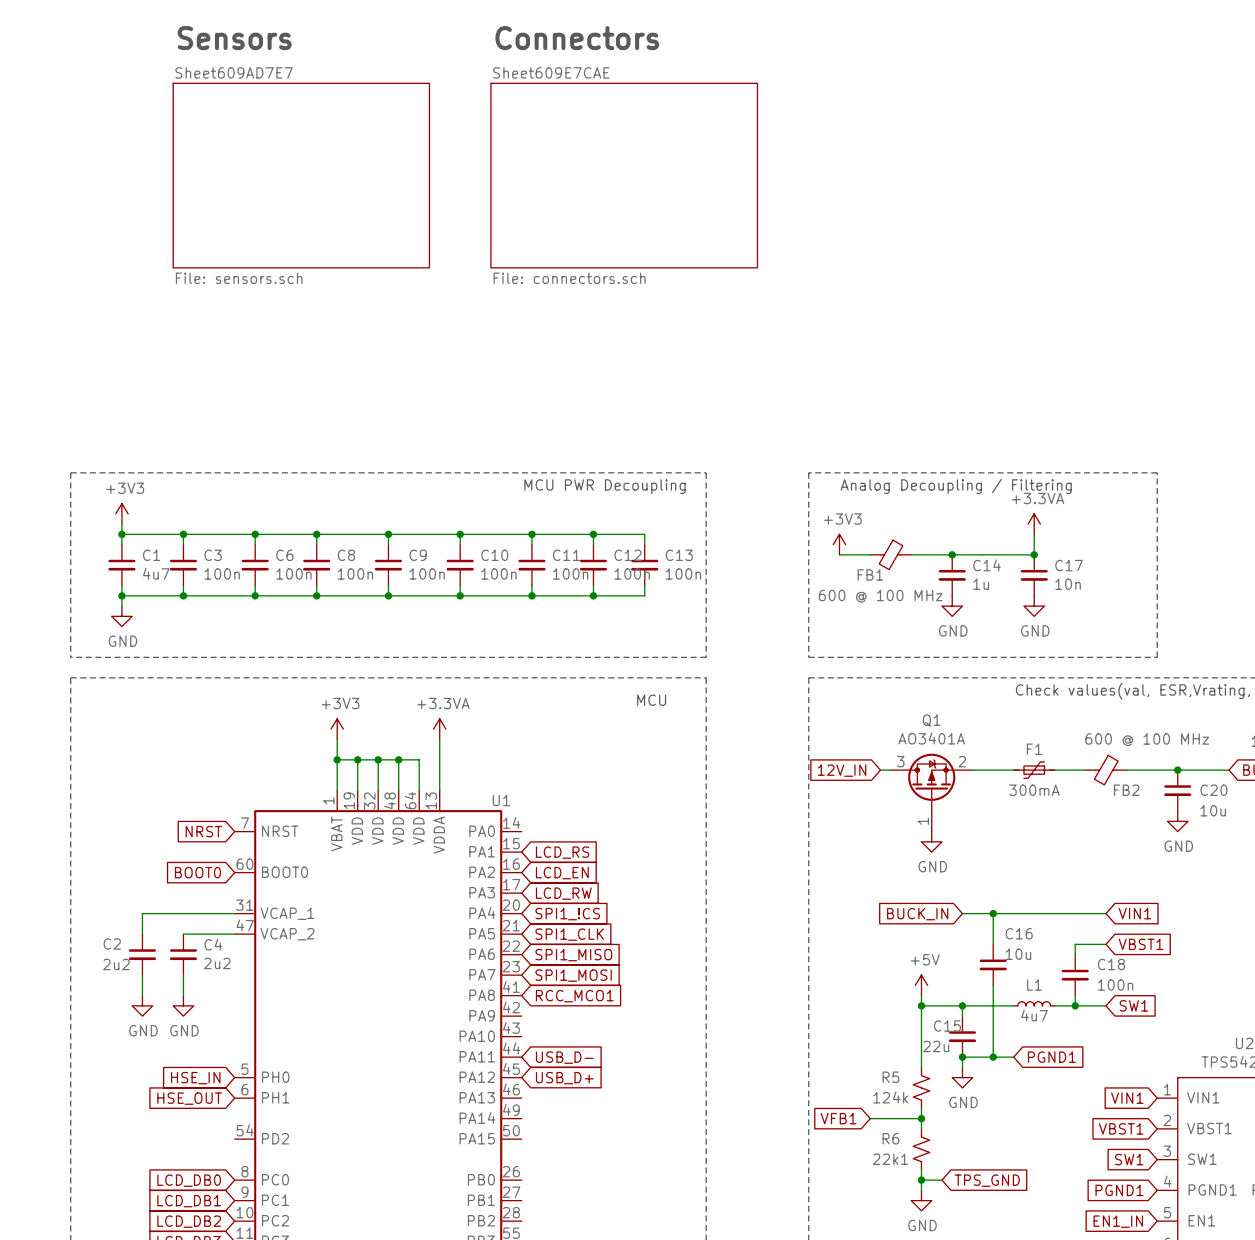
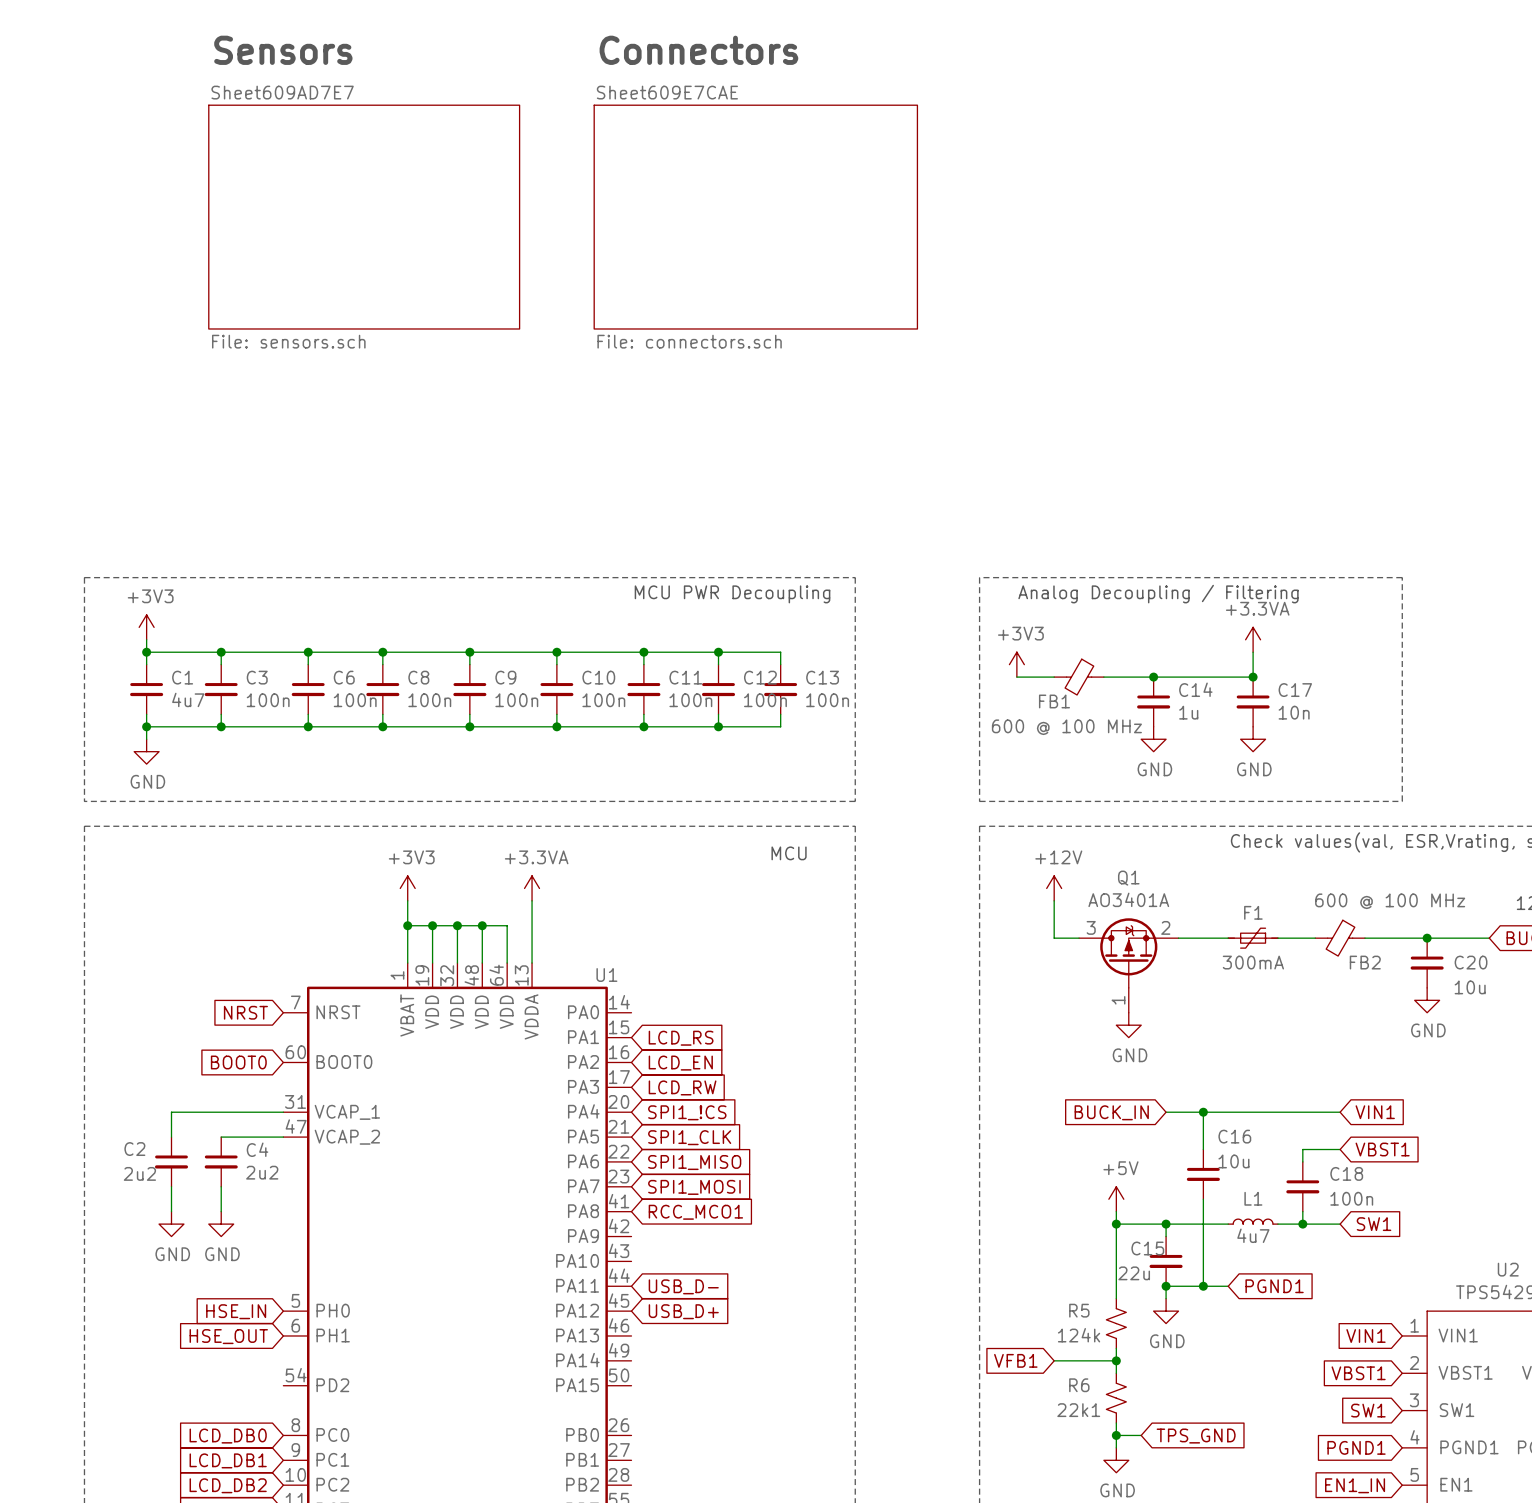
power symbol: none -> +12V (1054, 888)
wire: none -> (1054, 900) (1054, 938) (1066, 938)
global label: 12V_IN (842, 770) -> none

